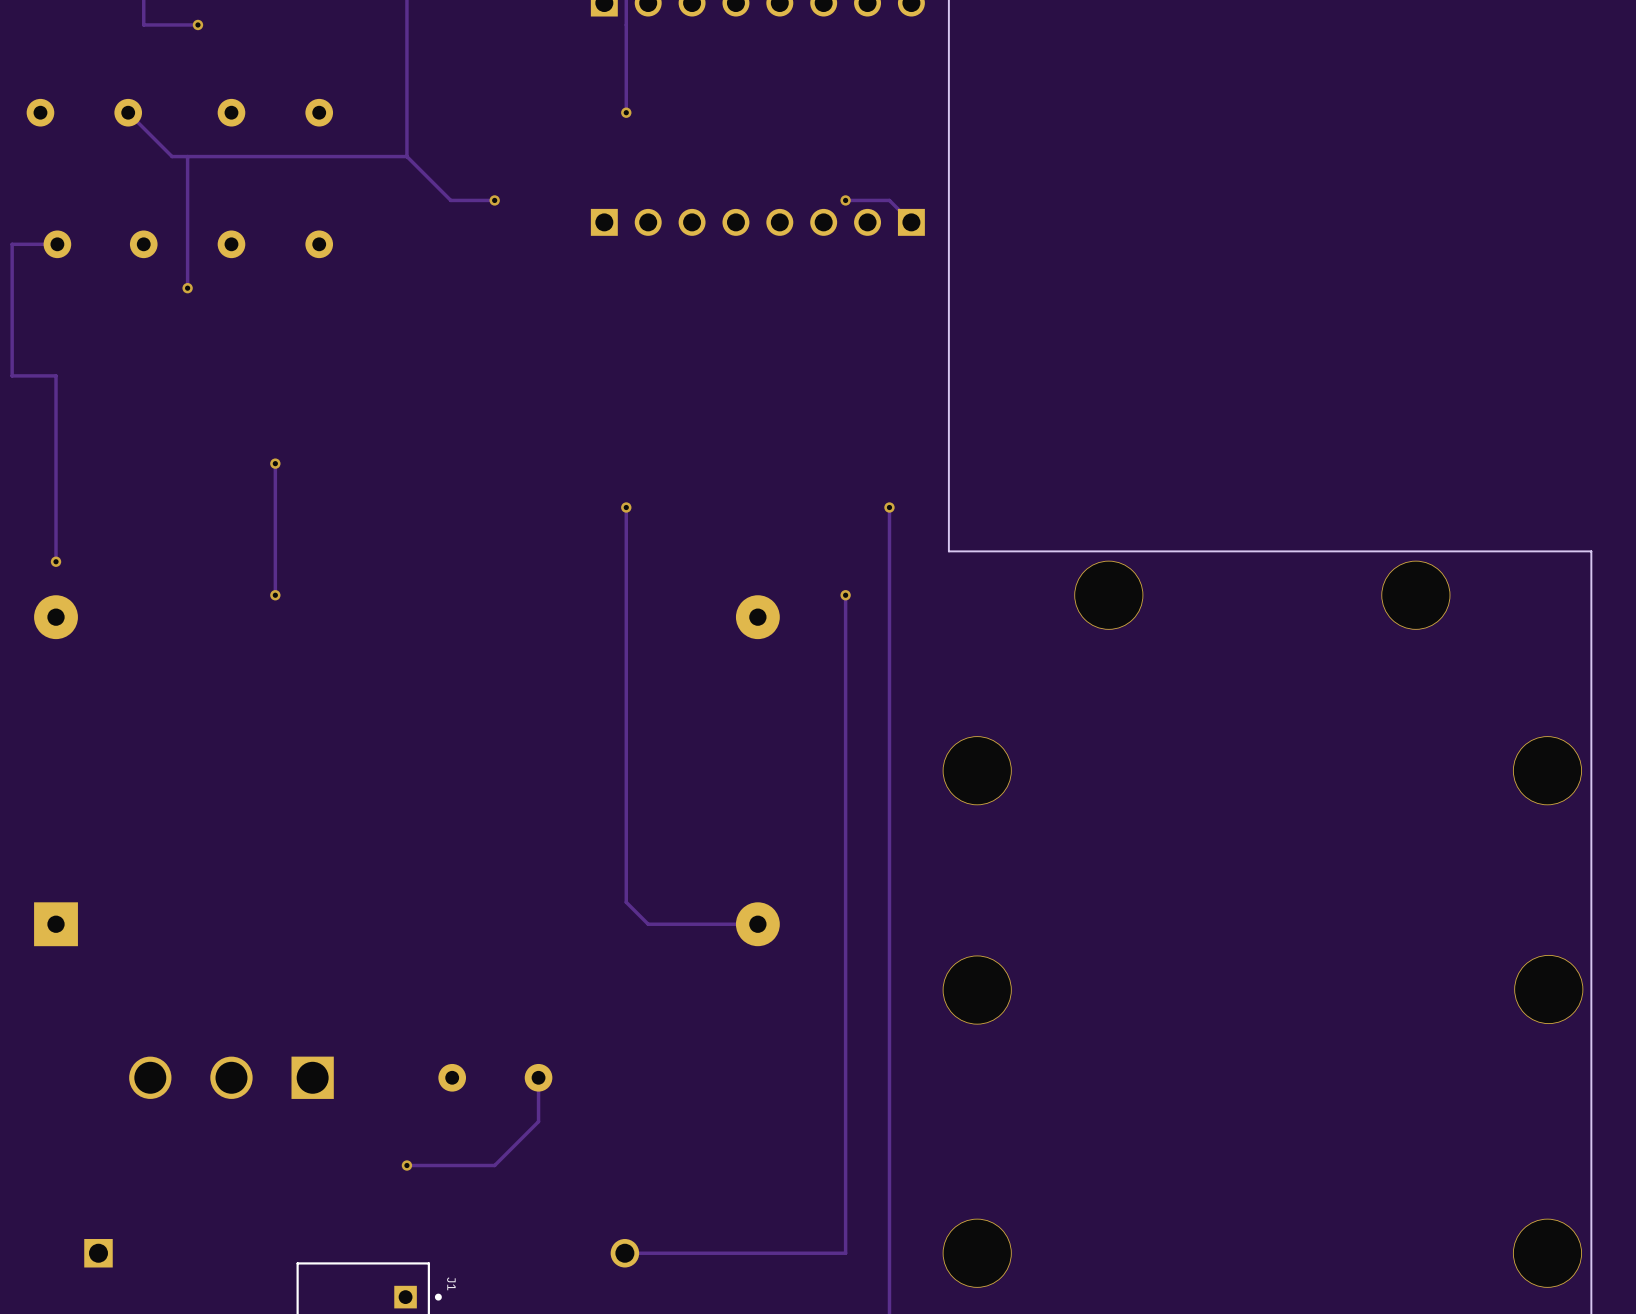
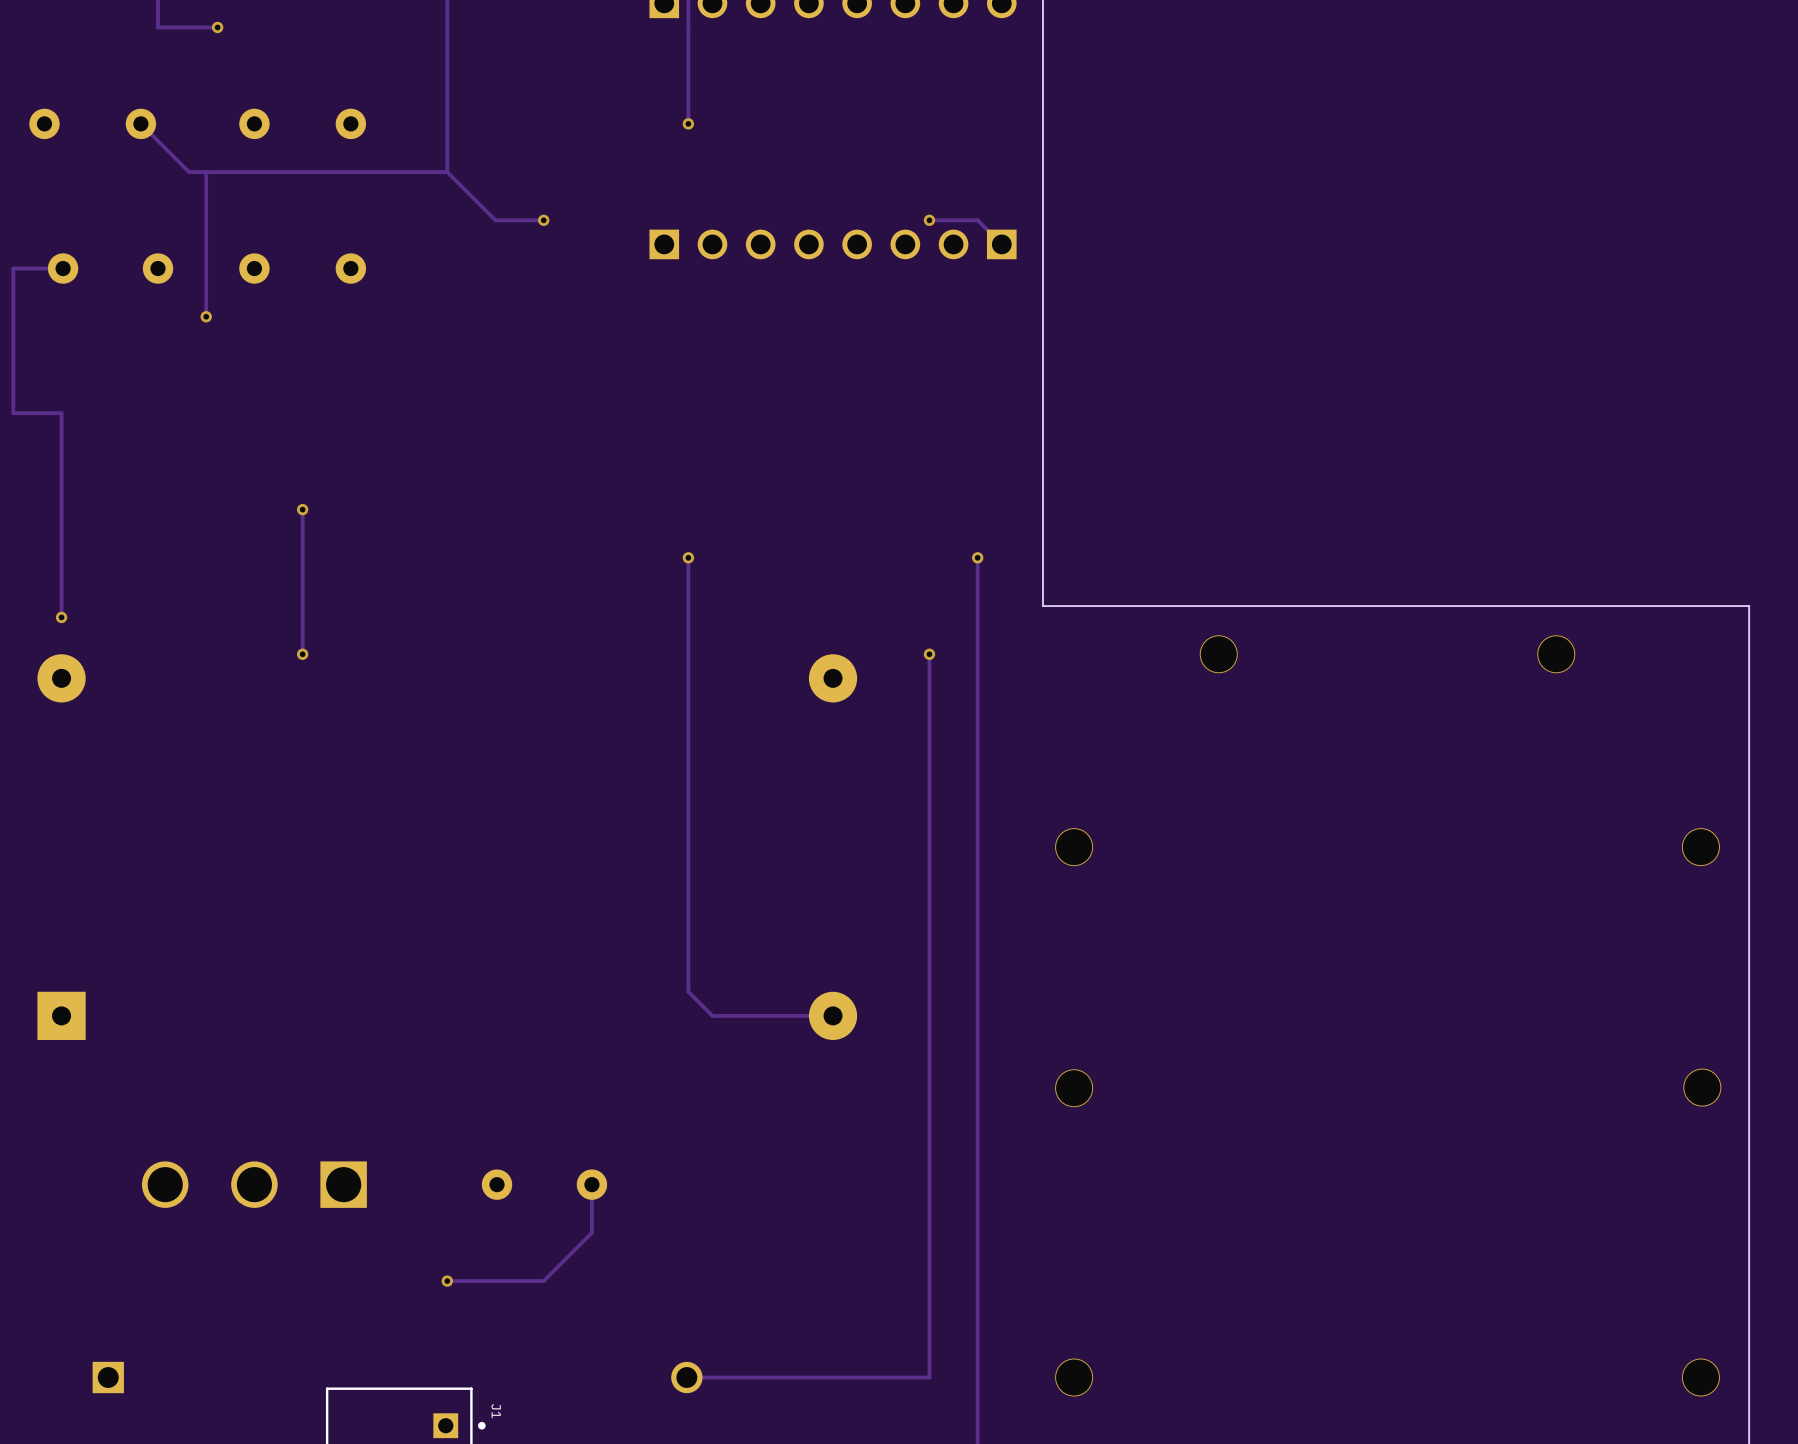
via size: [1074, 560, 1144, 630] -> [1199, 635, 1238, 674]
via size: [1381, 560, 1451, 630] -> [1537, 635, 1576, 674]
via size: [942, 736, 1012, 806] -> [1055, 828, 1094, 867]
via size: [1512, 736, 1583, 806] -> [1681, 828, 1720, 867]
via size: [1514, 954, 1584, 1025] -> [1683, 1068, 1722, 1107]
via size: [942, 955, 1012, 1025] -> [1055, 1069, 1094, 1108]
via size: [942, 1218, 1012, 1288] -> [1055, 1358, 1094, 1397]
via size: [1512, 1218, 1583, 1288] -> [1681, 1358, 1720, 1397]

